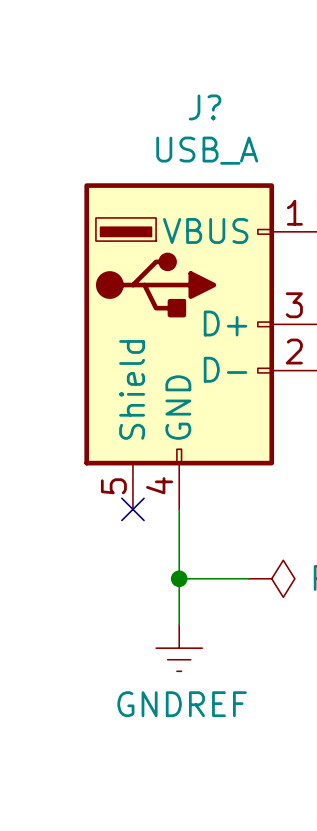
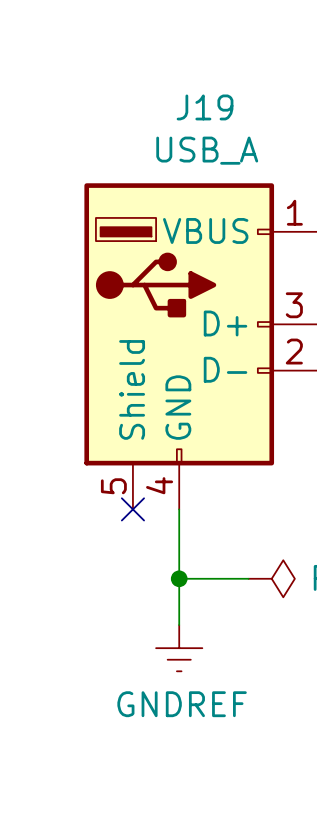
J? name: J? (205, 107) -> J19 (205, 107)

